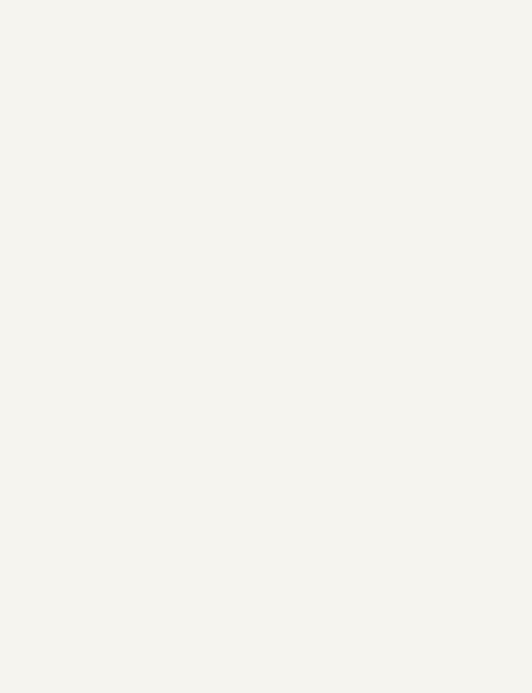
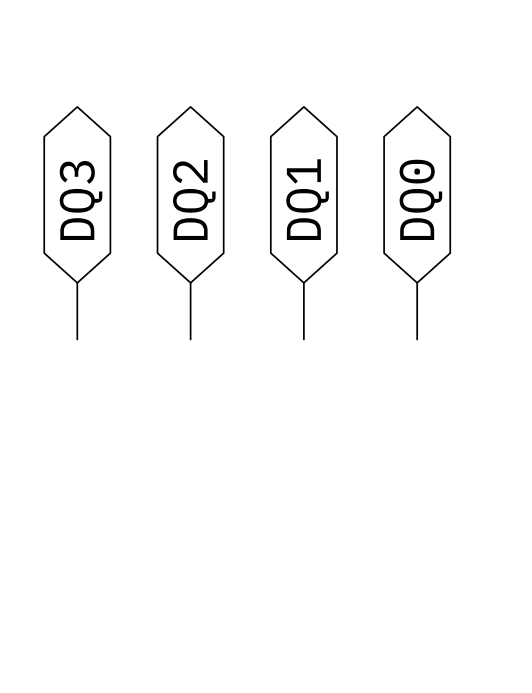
global label: none -> DQ3 (81, 200)
global label: none -> DQ2 (194, 200)
global label: none -> DQ1 (307, 199)
global label: none -> DQ0 (420, 199)
wire: none -> (77, 282) (77, 339)
wire: none -> (190, 282) (190, 339)
wire: none -> (303, 282) (303, 339)
wire: none -> (417, 282) (417, 339)

